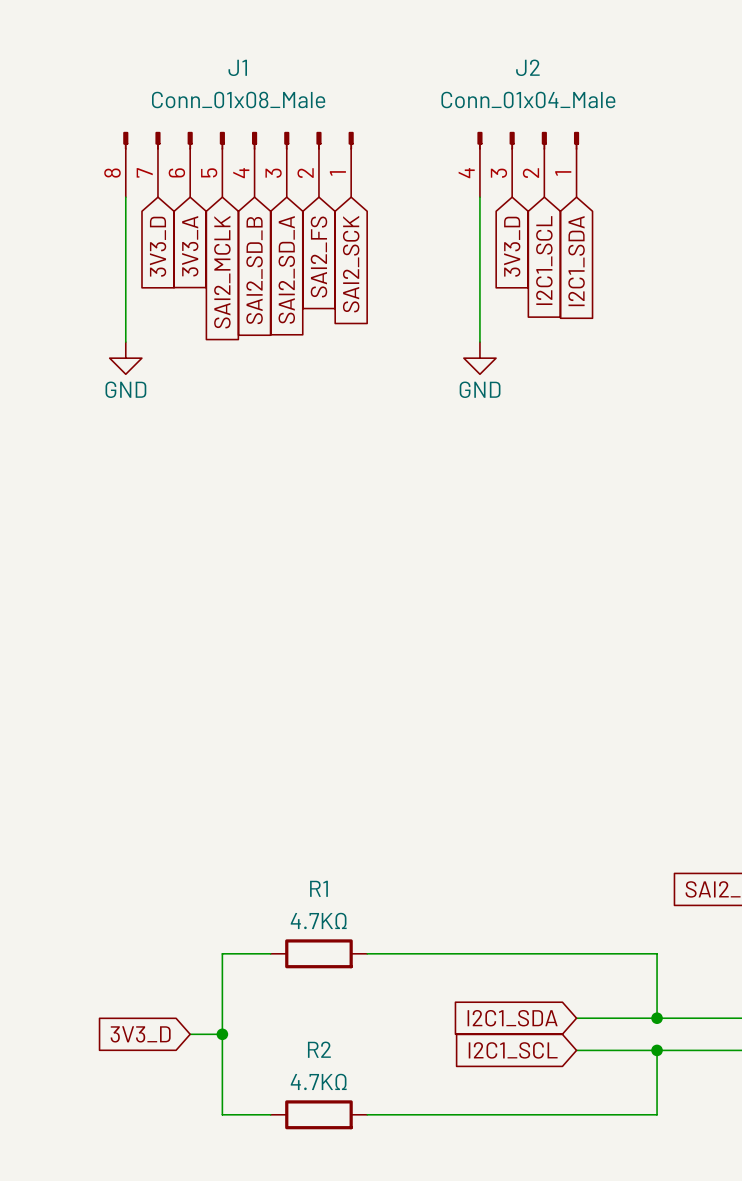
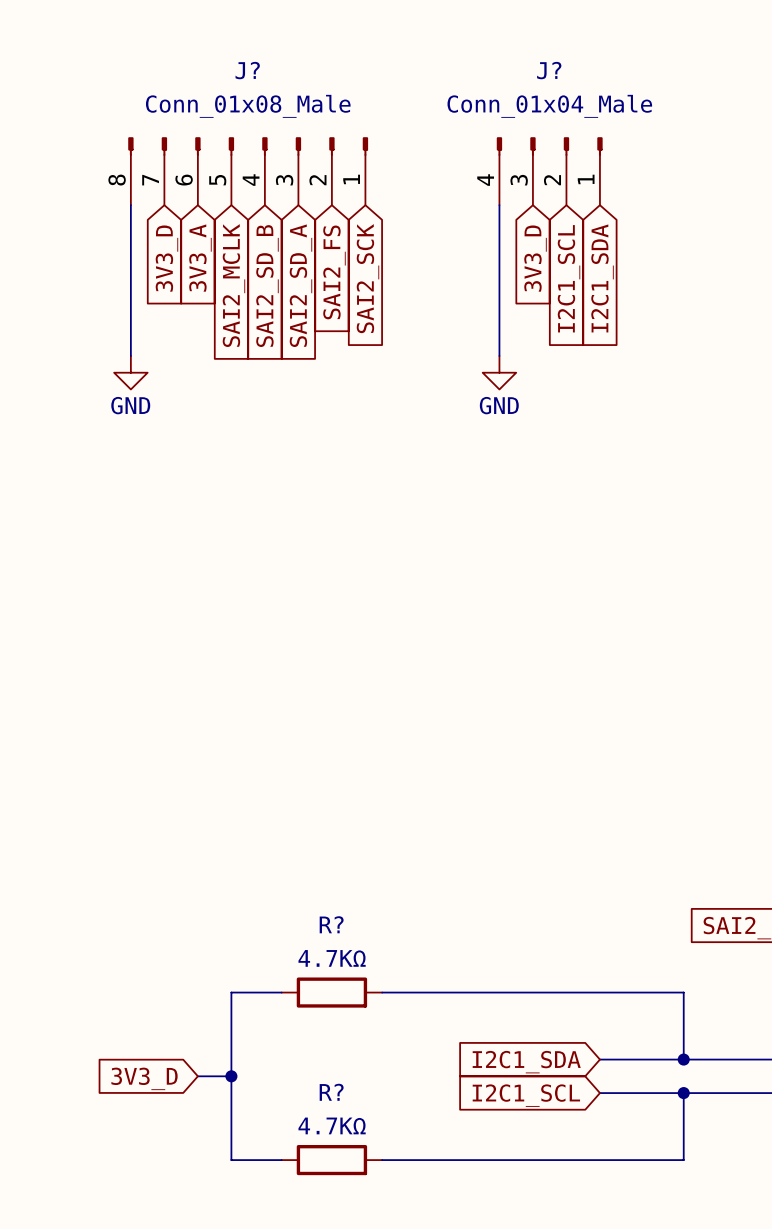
J1 name: J1 (237, 67) -> J? (247, 70)
J2 name: J2 (527, 67) -> J? (549, 70)
R1 name: R1 (318, 888) -> R? (331, 924)
R2 name: R2 (319, 1049) -> R? (331, 1092)

